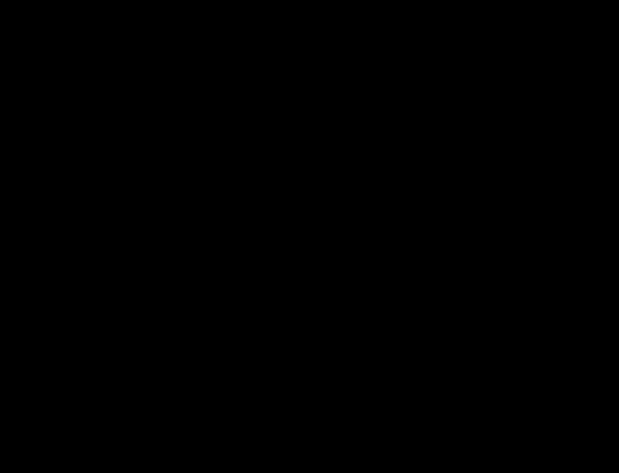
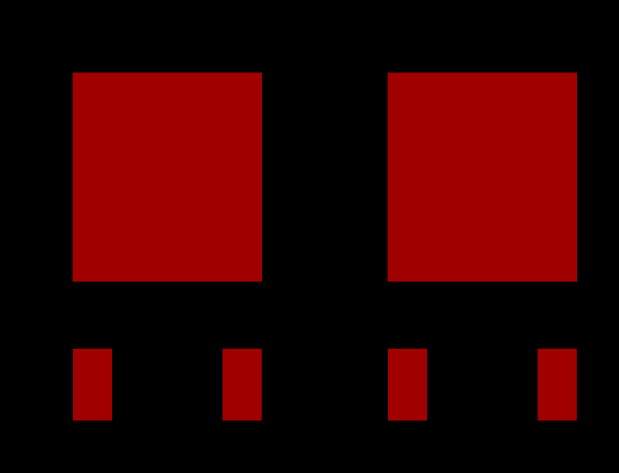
part: none -> (167, 246)
part: none -> (482, 246)

